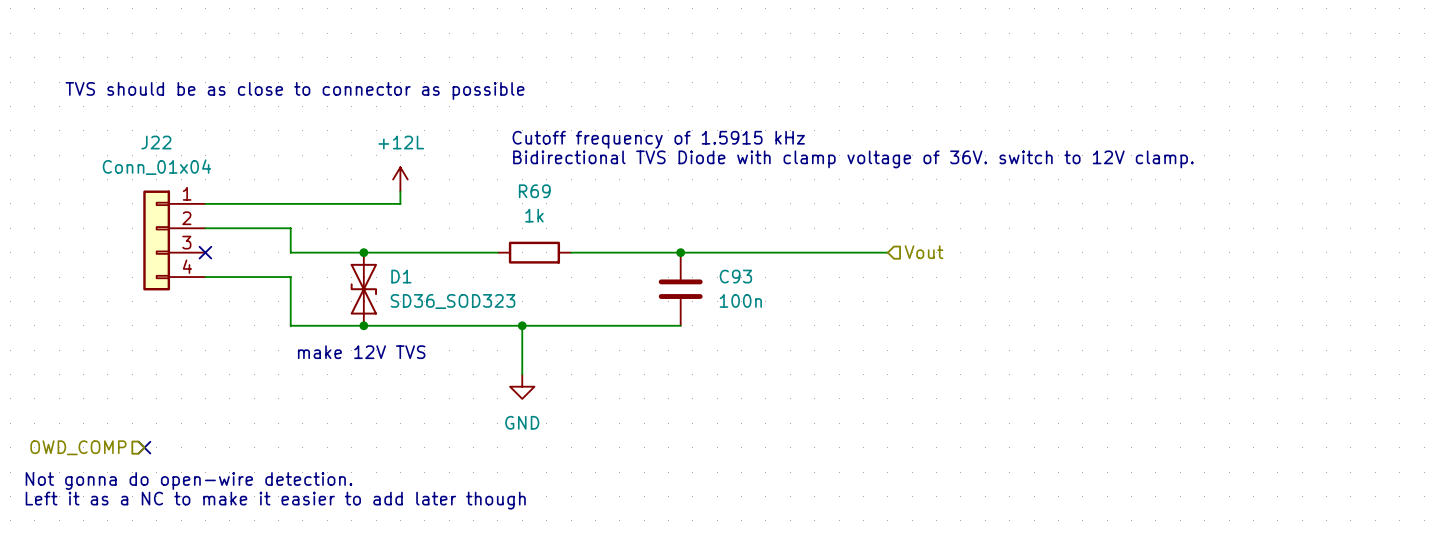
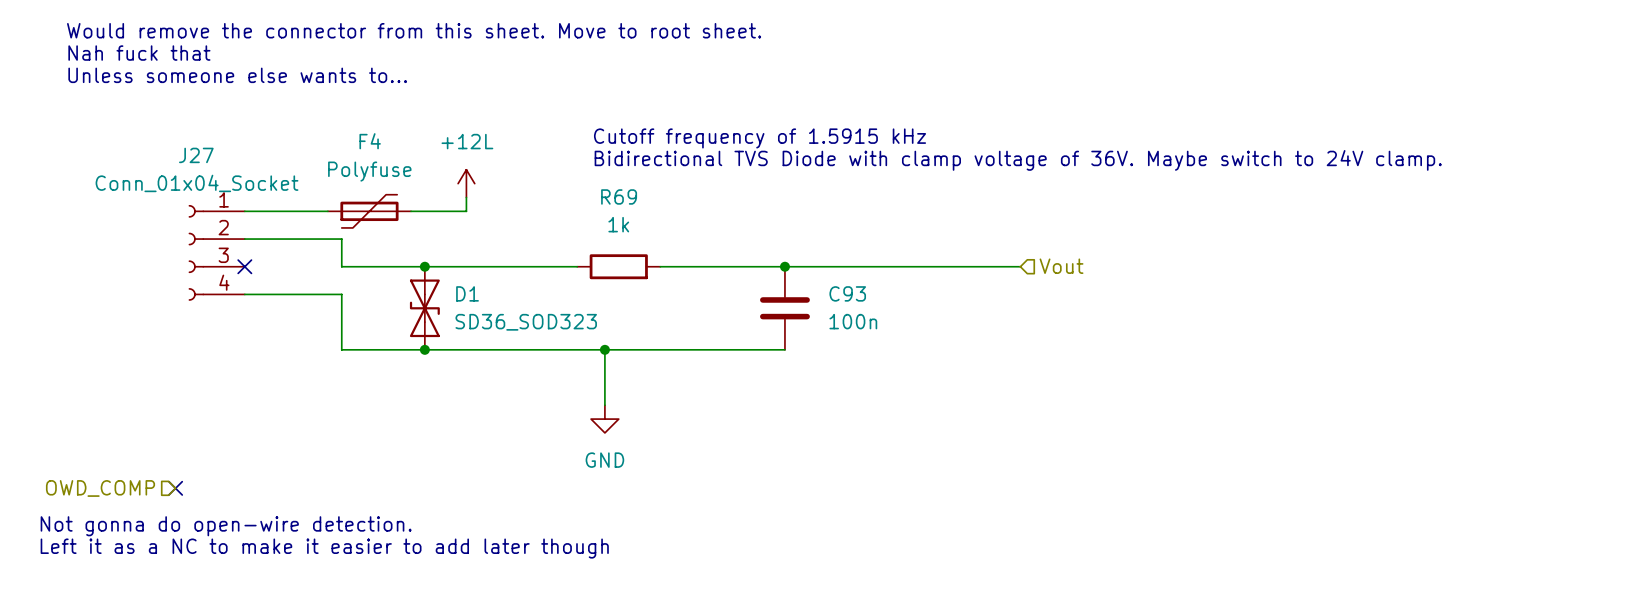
text: none -> Would remove the connector from this sheet. Move to root sheet. (414, 30)
text: none -> Nah fuck that (139, 53)
text: none -> Unless someone else wants to... (237, 75)
text: TVS should be as close to connector as possible (295, 90) -> none
text: Bidirectional TVS Diode with clamp voltage of 36V. switch to 12V clamp. (853, 159) -> Bidirectional TVS Diode with clamp voltage of 36V. Maybe switch to 24V clamp. (1018, 160)
F4: none -> Polyfuse (369, 211)
J22: Conn_01x04 (174, 240) -> none
J27: none -> Conn_01x04_Socket (216, 252)
text: make 12V TVS (361, 352) -> none

